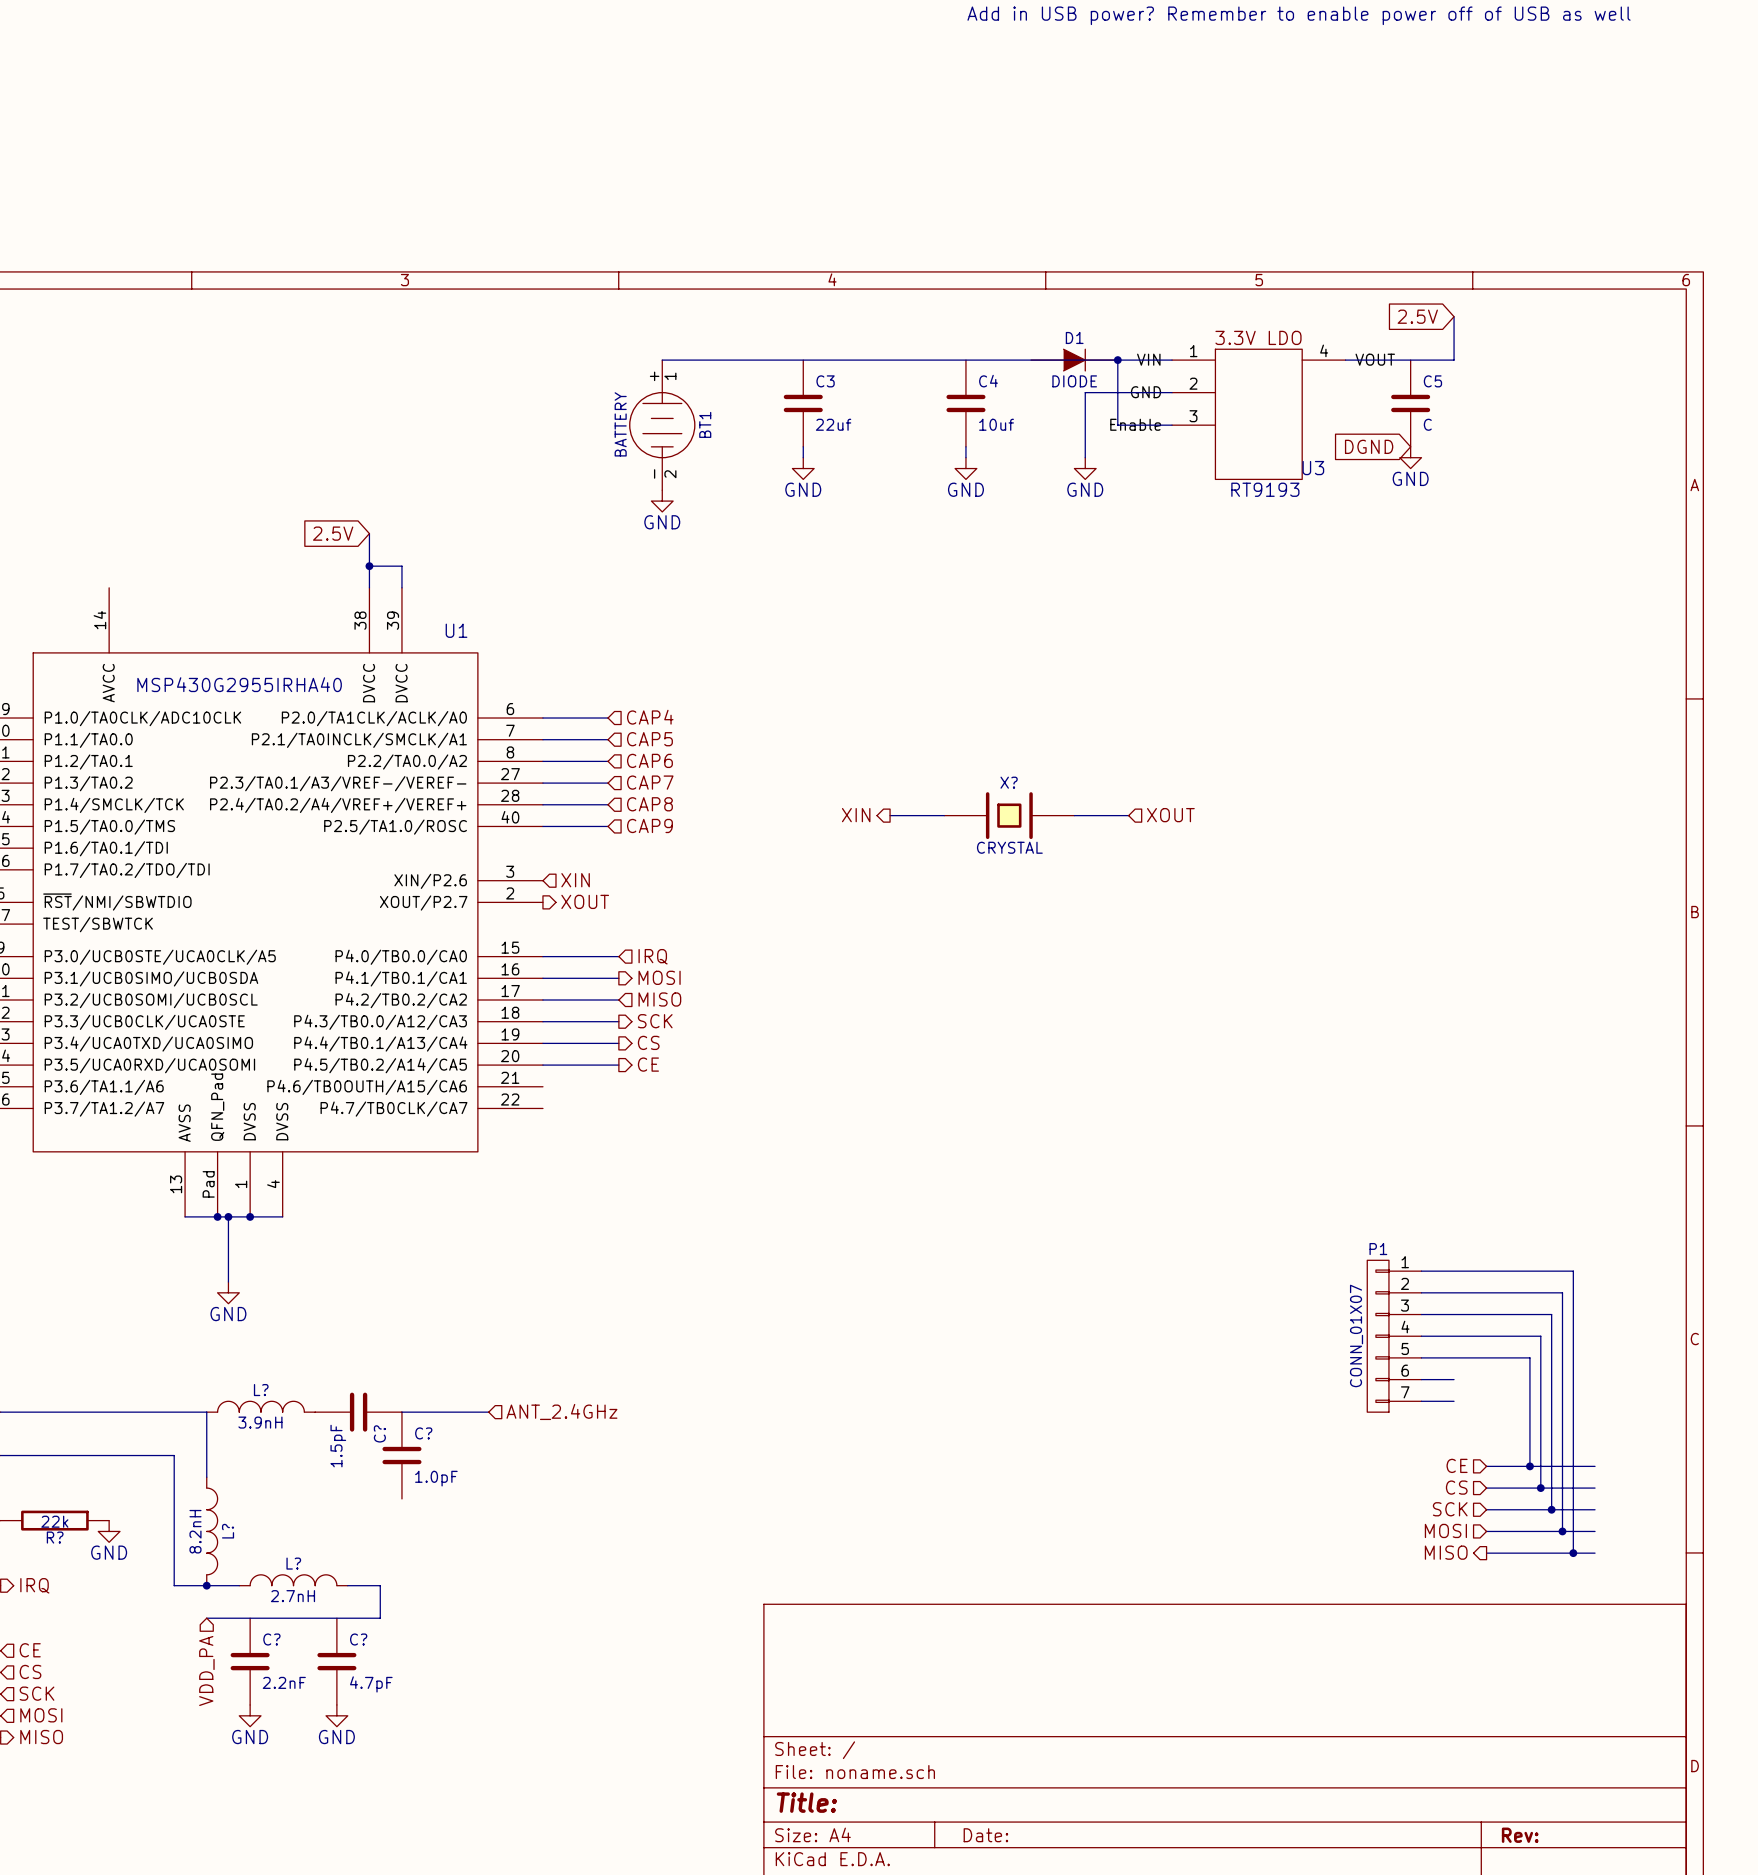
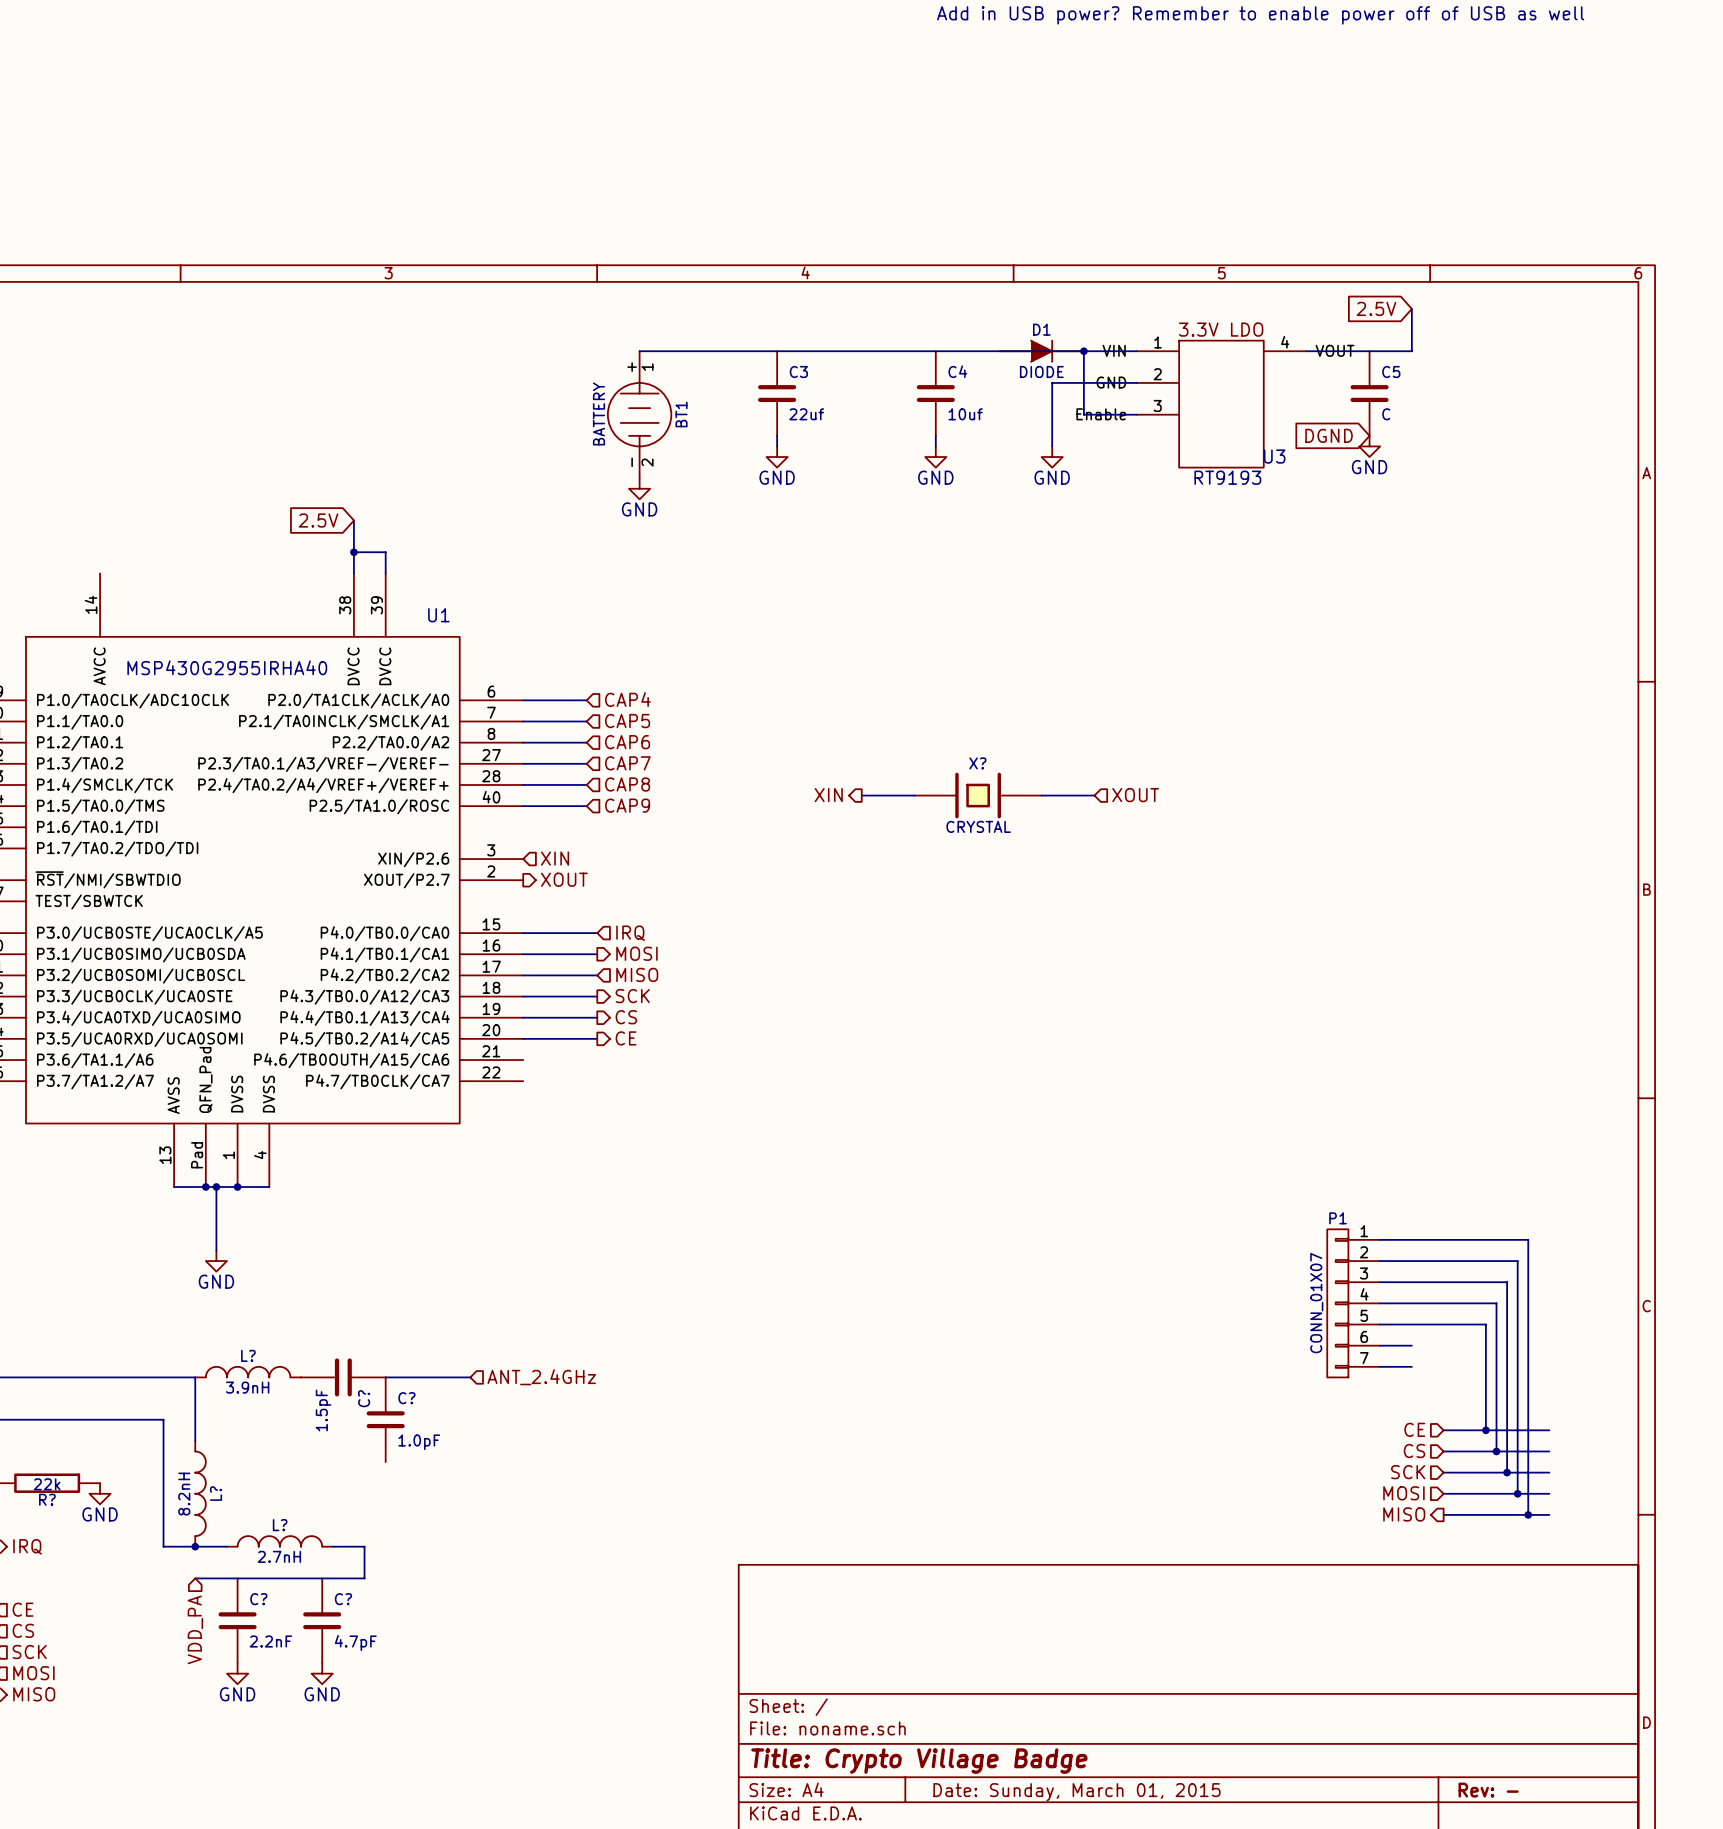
title block: Title: (806, 1802) -> Title: Crypto Village Badge (919, 1761)
title block: Date: (985, 1835) -> Date: Sunday, March 01, 2015 (1076, 1792)
title block: Rev: (1520, 1835) -> Rev: - (1488, 1790)

